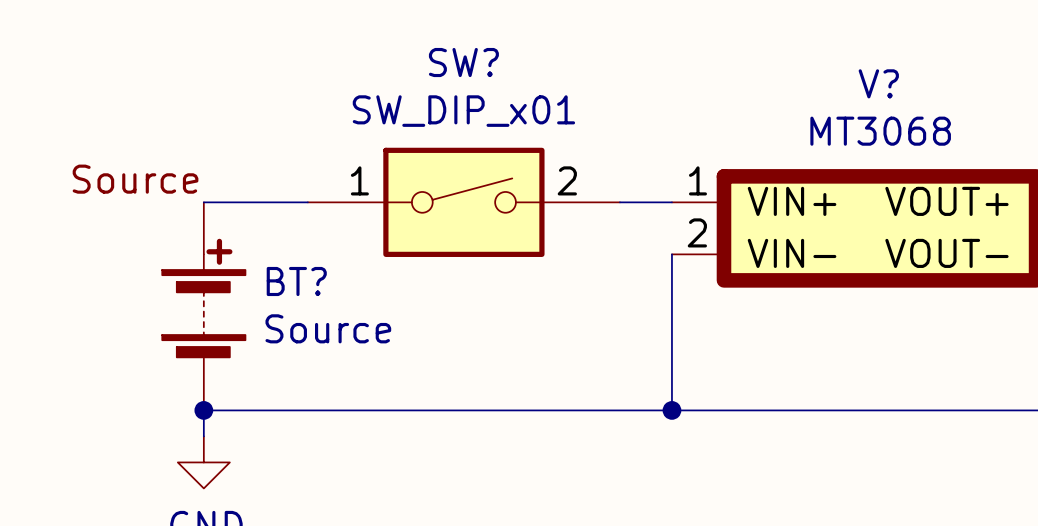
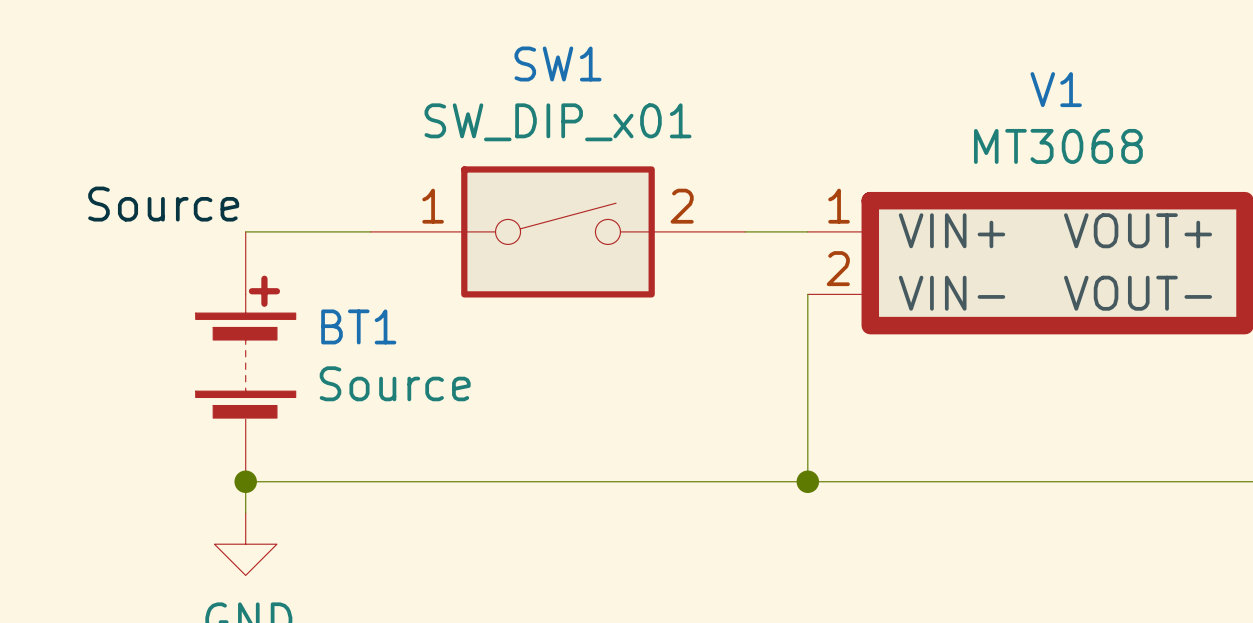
SW? name: SW? (463, 62) -> SW1 (557, 63)
V? name: V? (878, 83) -> V1 (1056, 89)
BT? name: BT? (296, 281) -> BT1 (358, 326)

